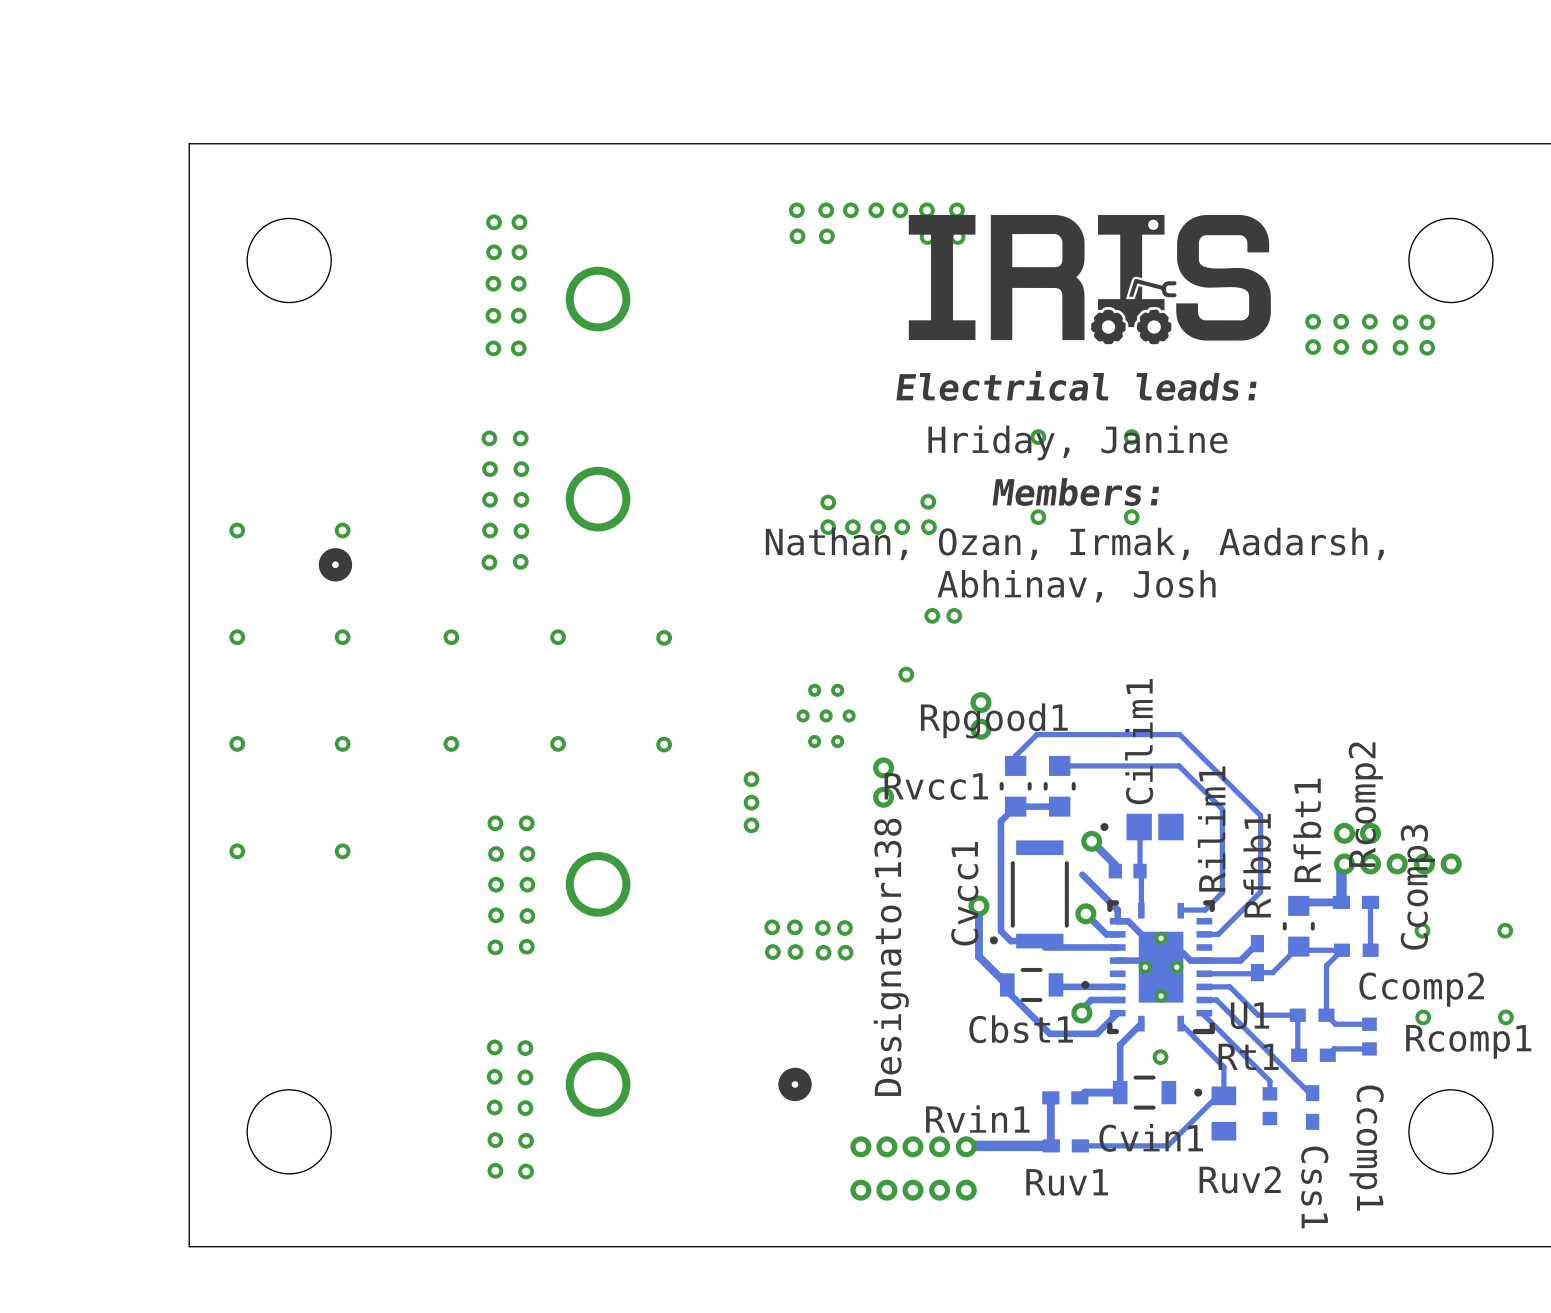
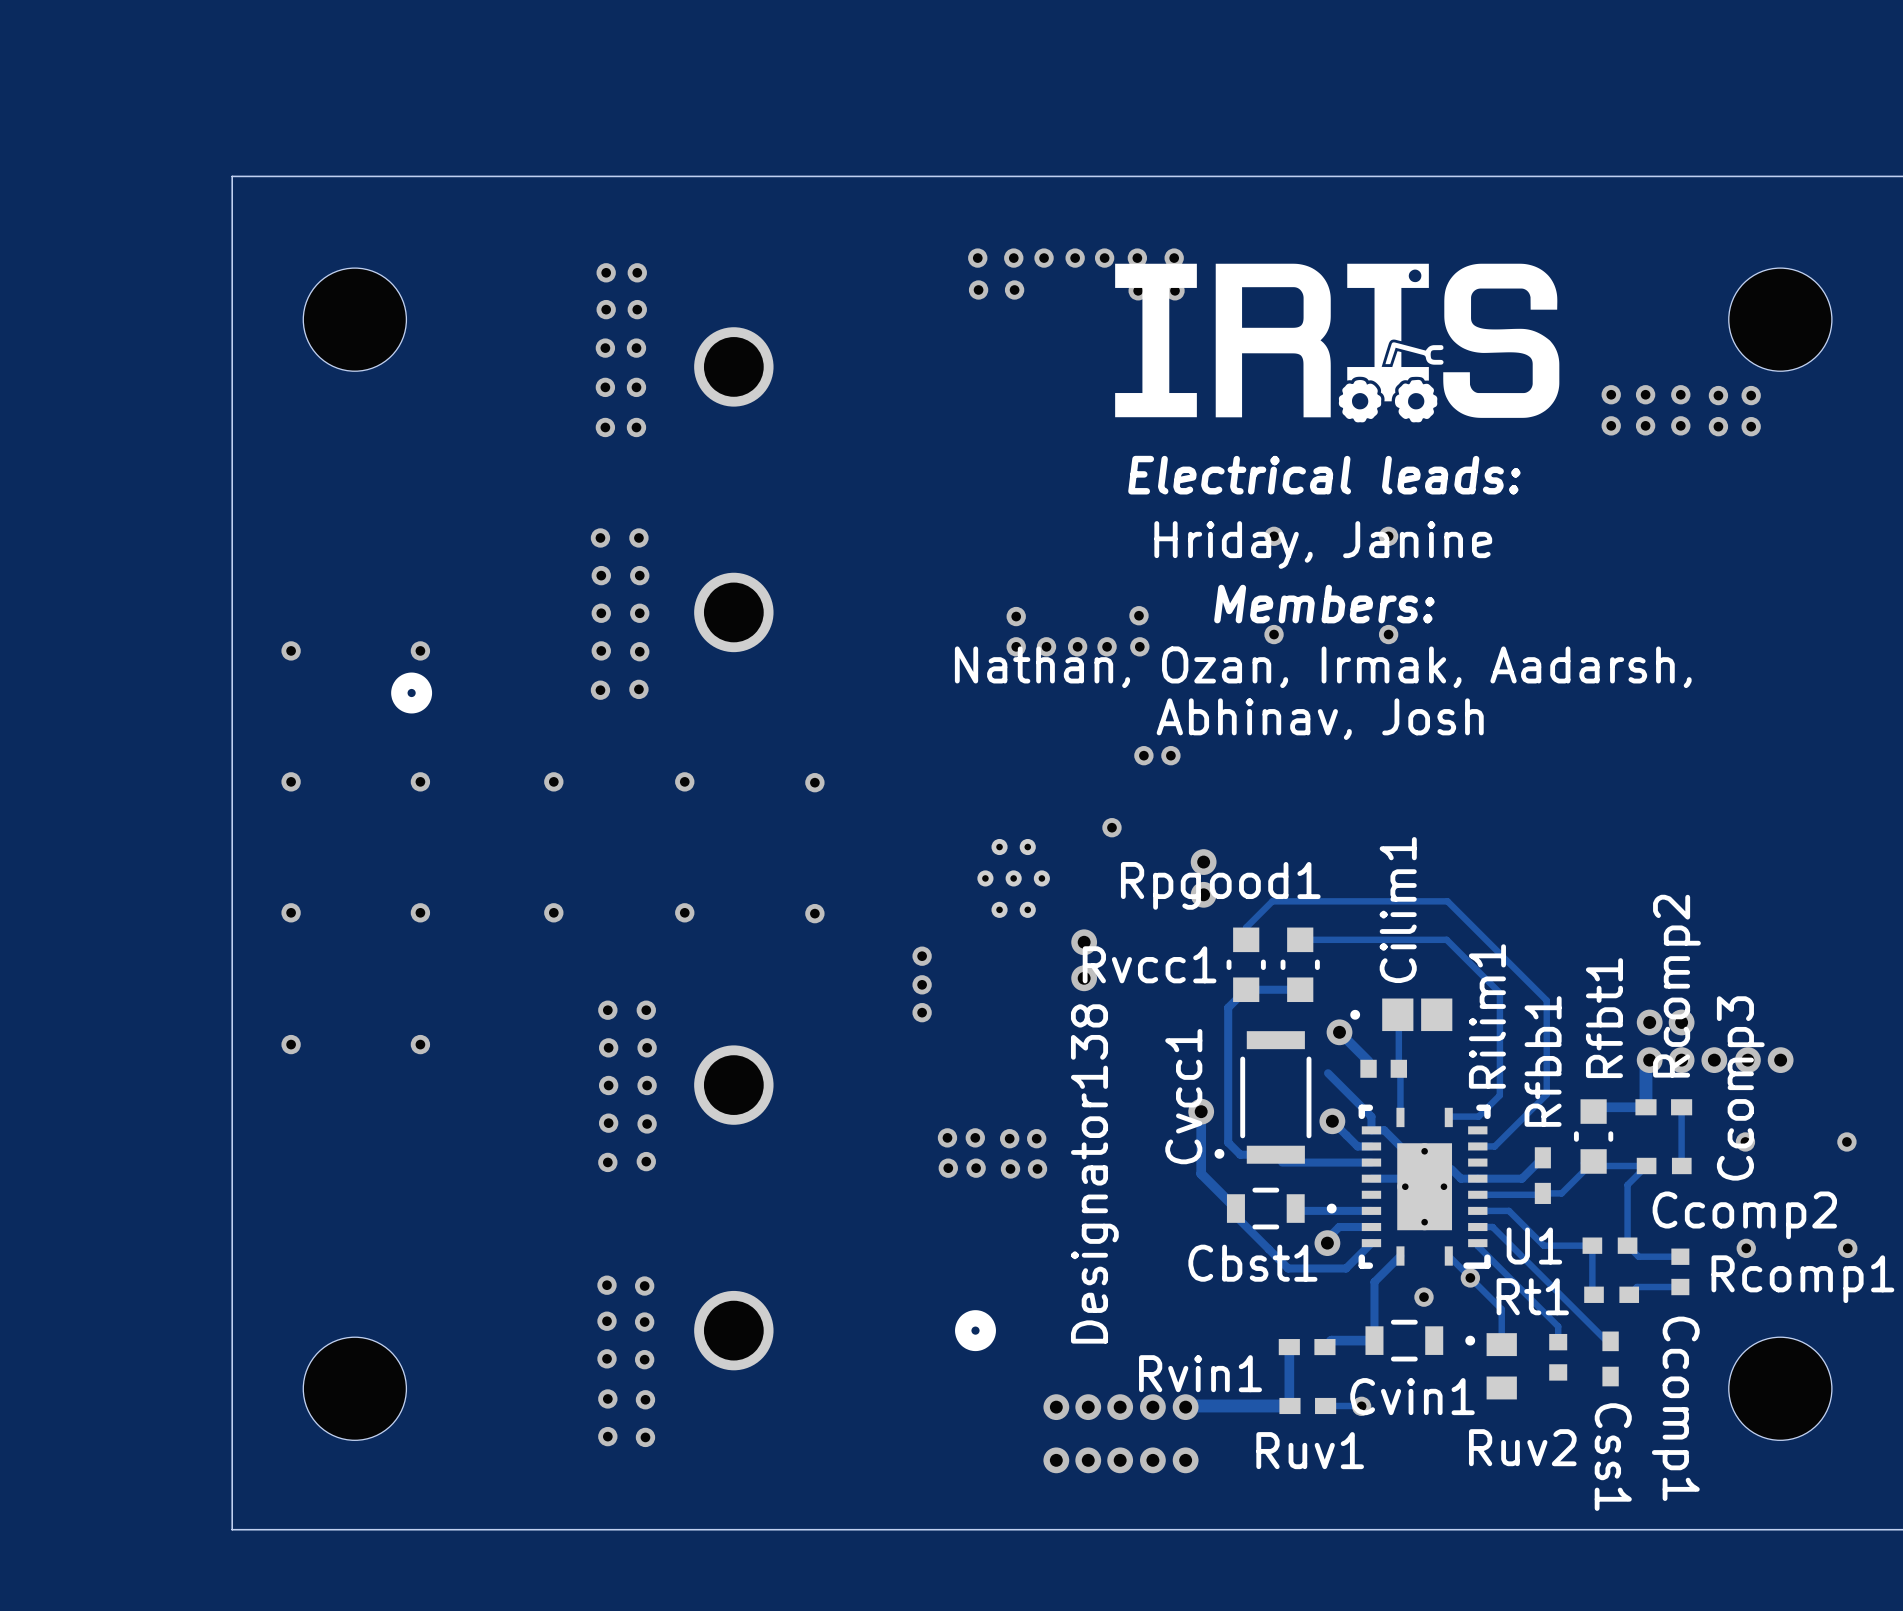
via: none -> (1470, 1277)
track: (1217, 1095) (1167, 1145) (1109, 1145) -> none
via: none -> (1361, 1406)

